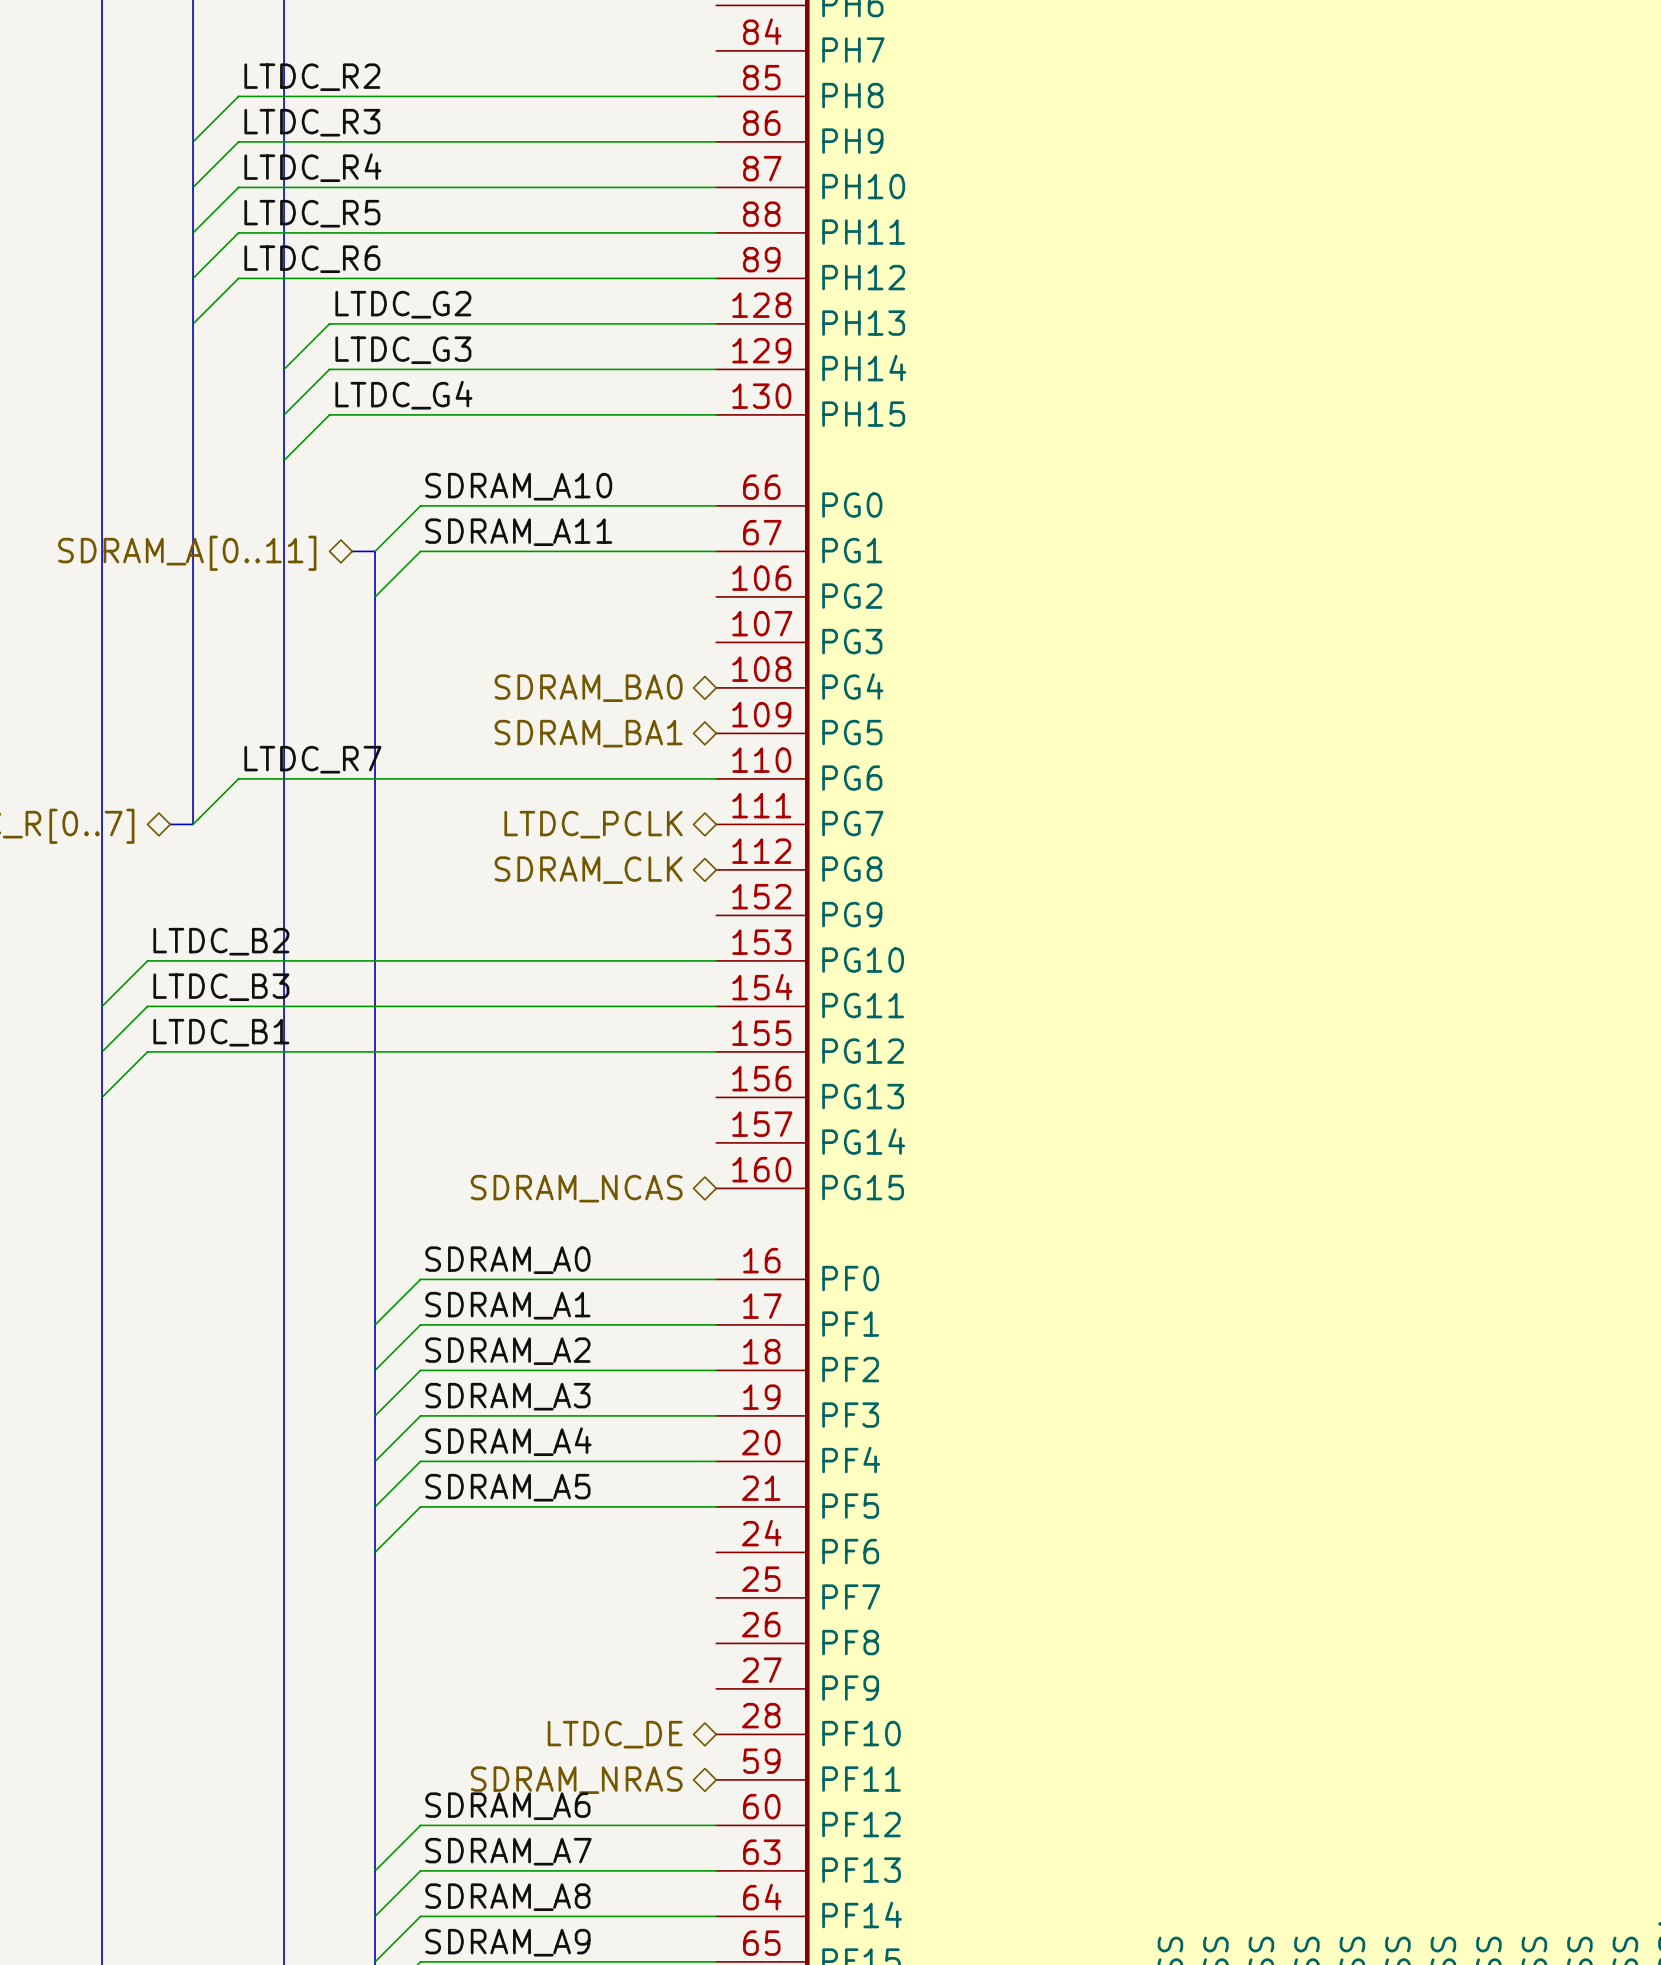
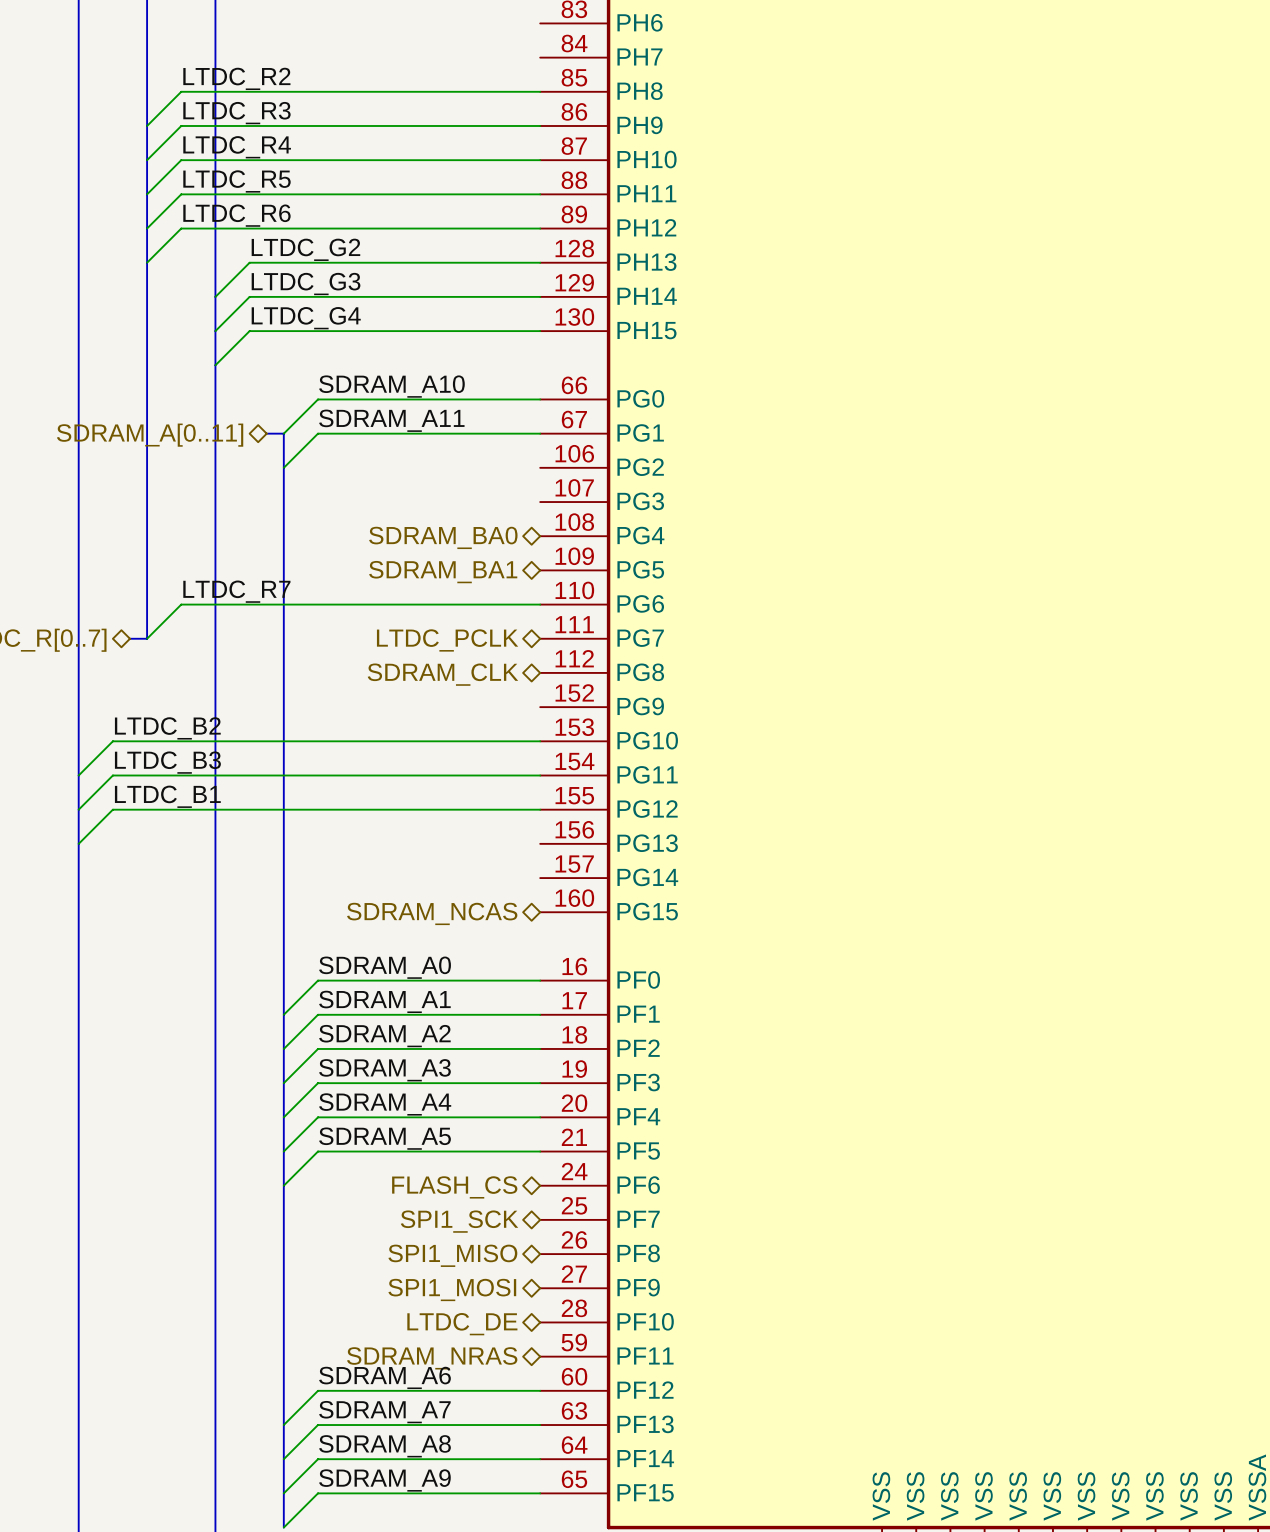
hierarchical label: none -> FLASH_CS (454, 1187)
hierarchical label: none -> SPI1_SCK (459, 1221)
hierarchical label: none -> SPI1_MISO (452, 1255)
hierarchical label: none -> SPI1_MOSI (452, 1289)

